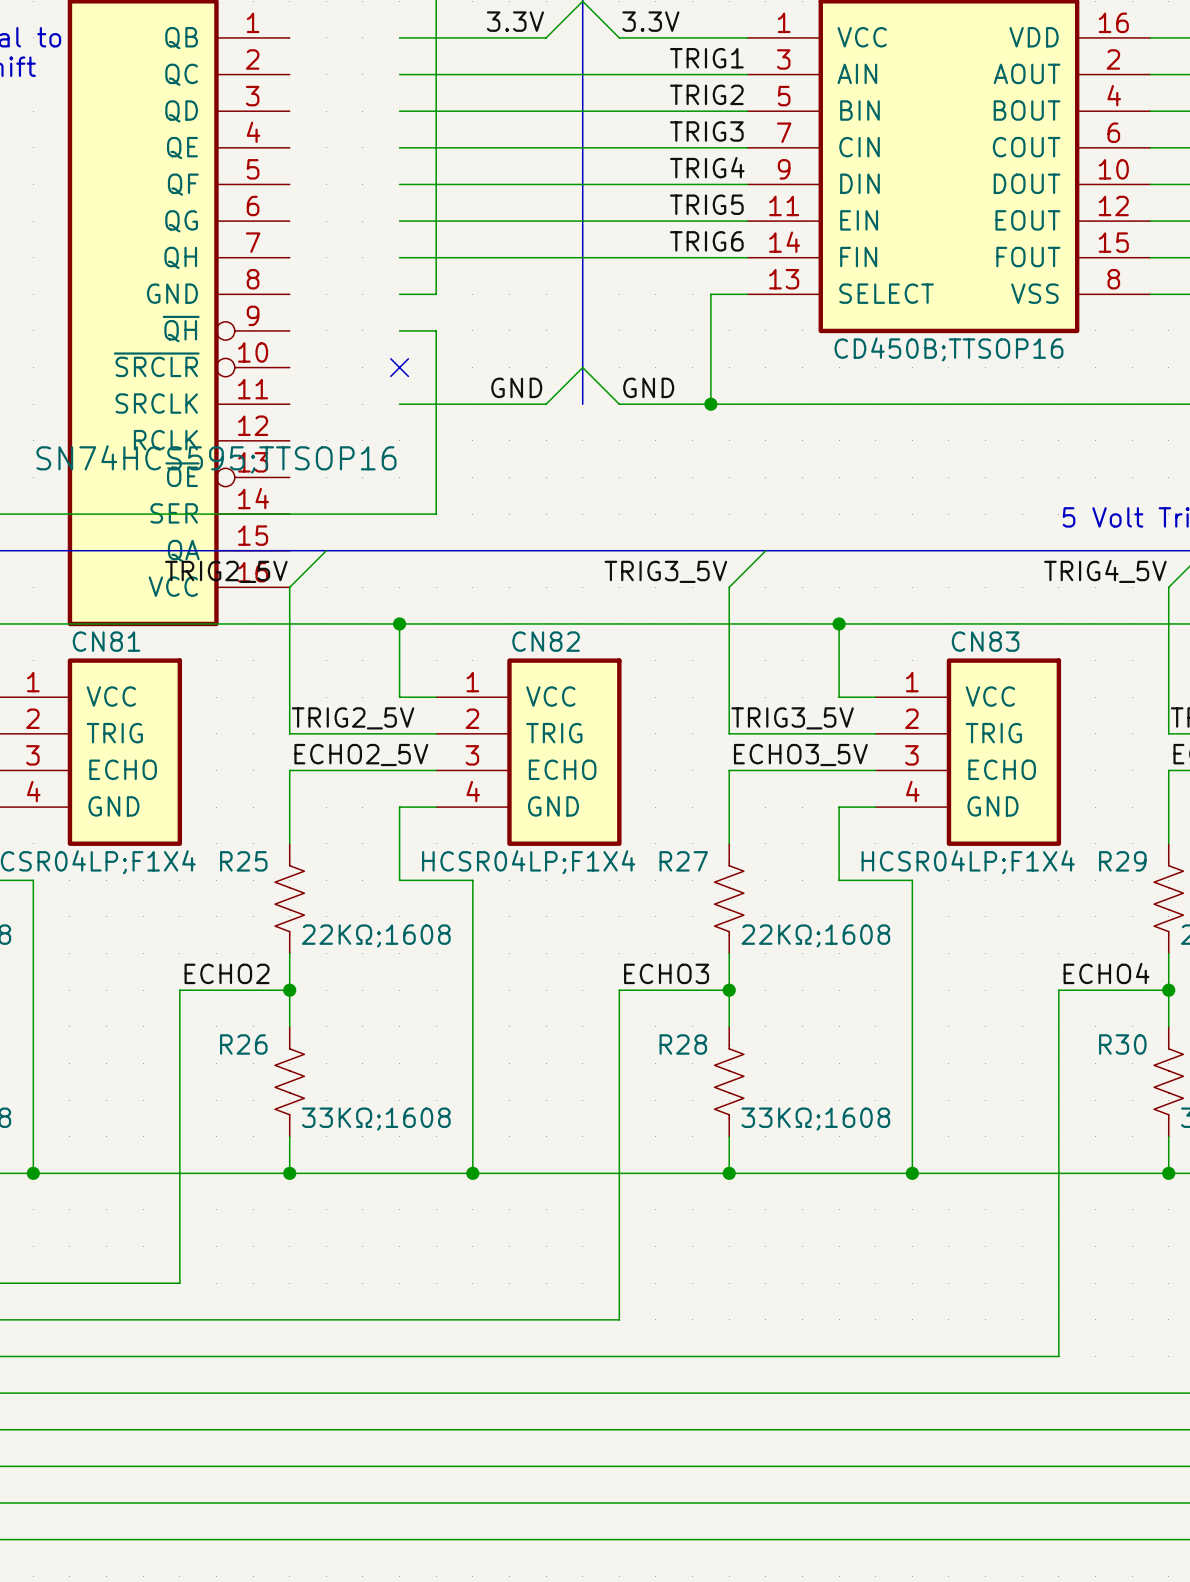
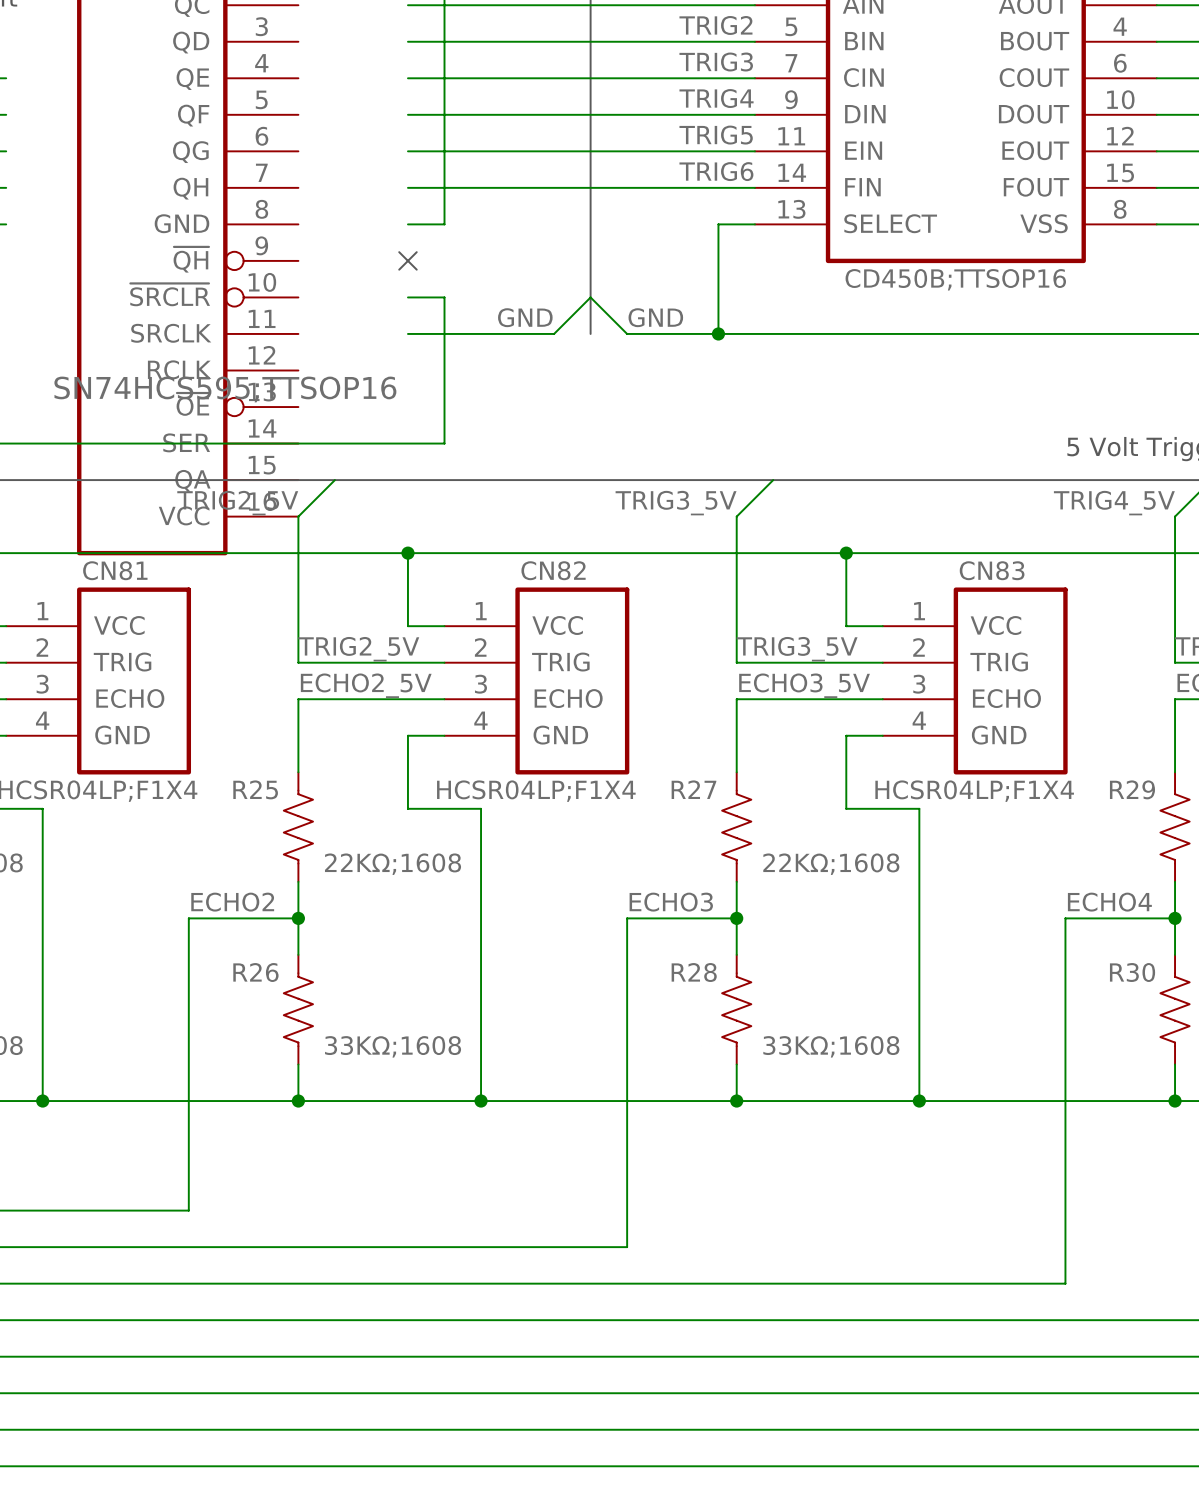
wire: (399, 330) (436, 330) (436, 367) -> (407, 297) (444, 297)
no-connect mark position: (399, 367) -> (407, 260)

